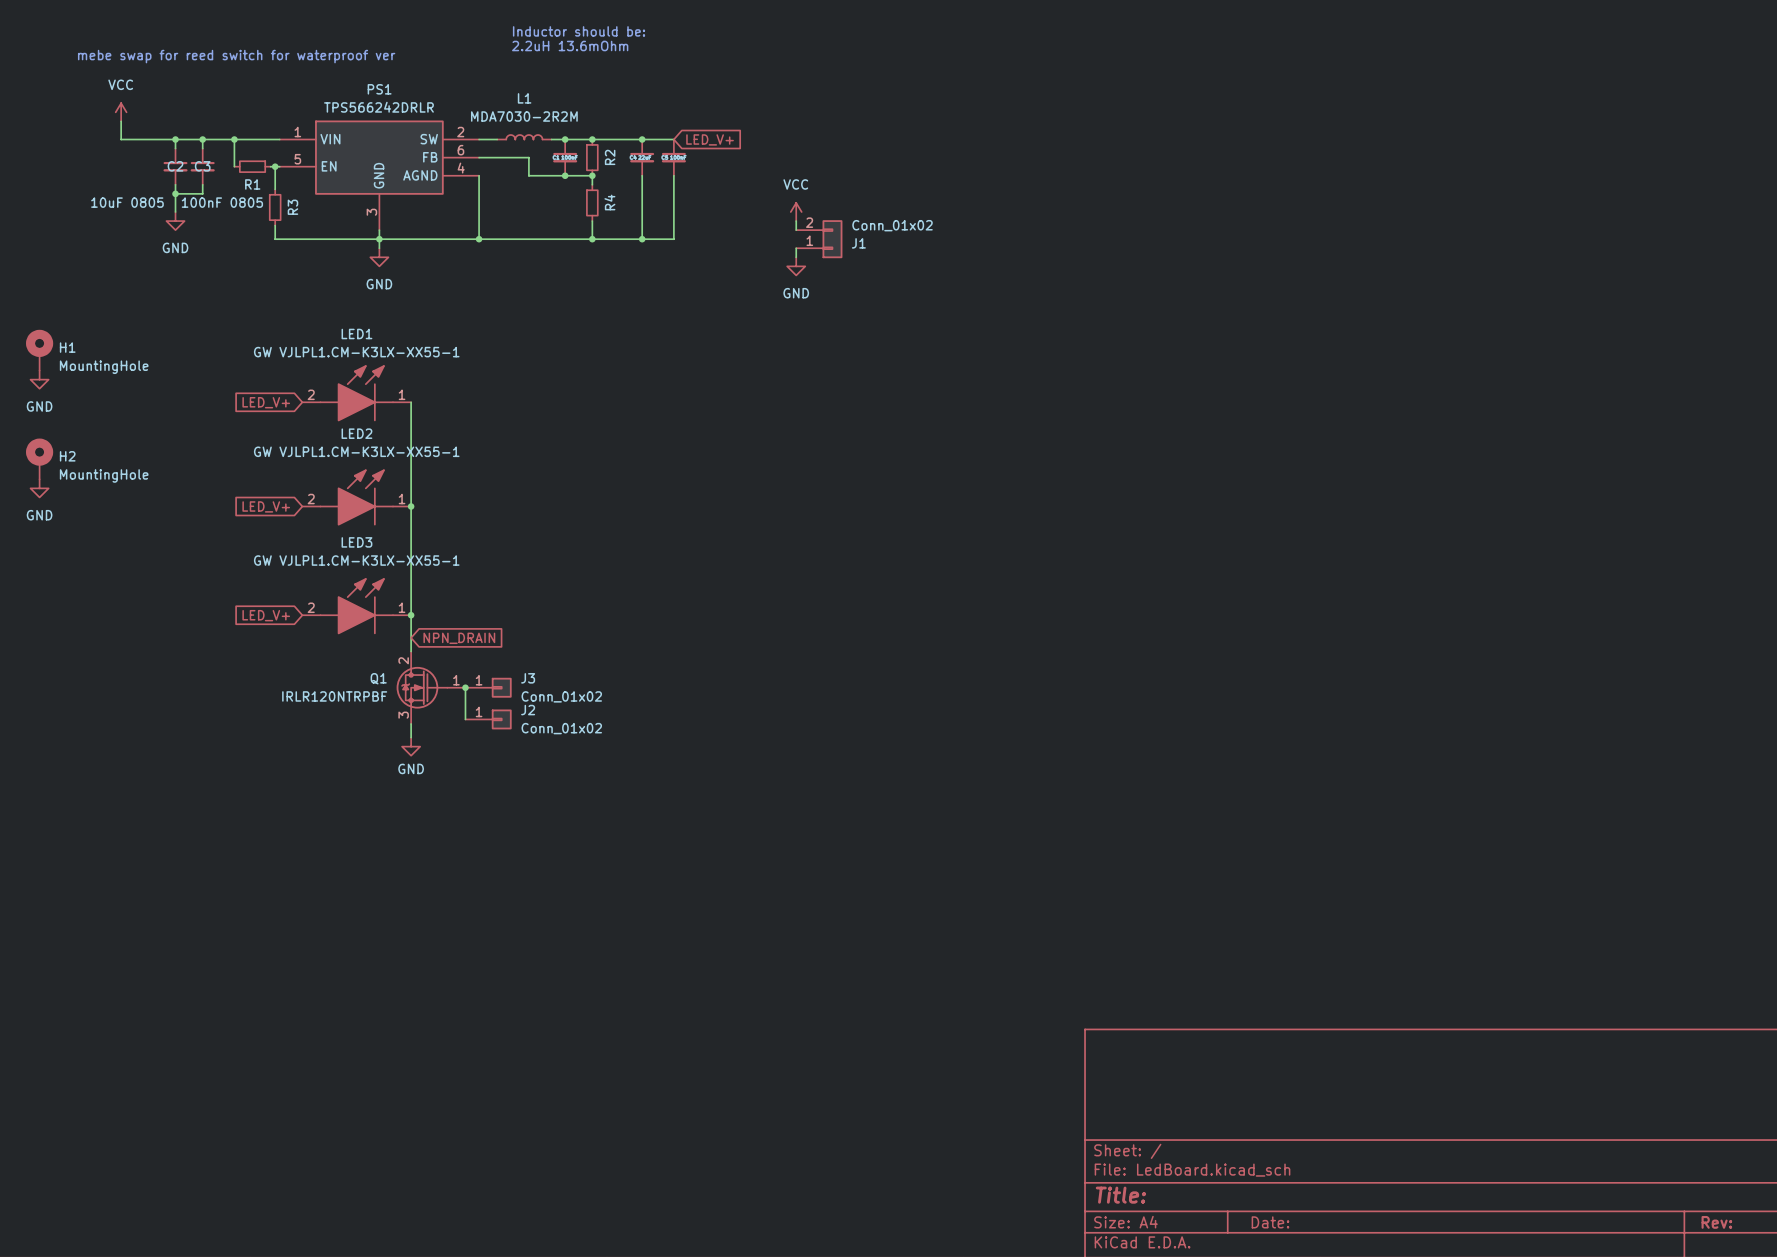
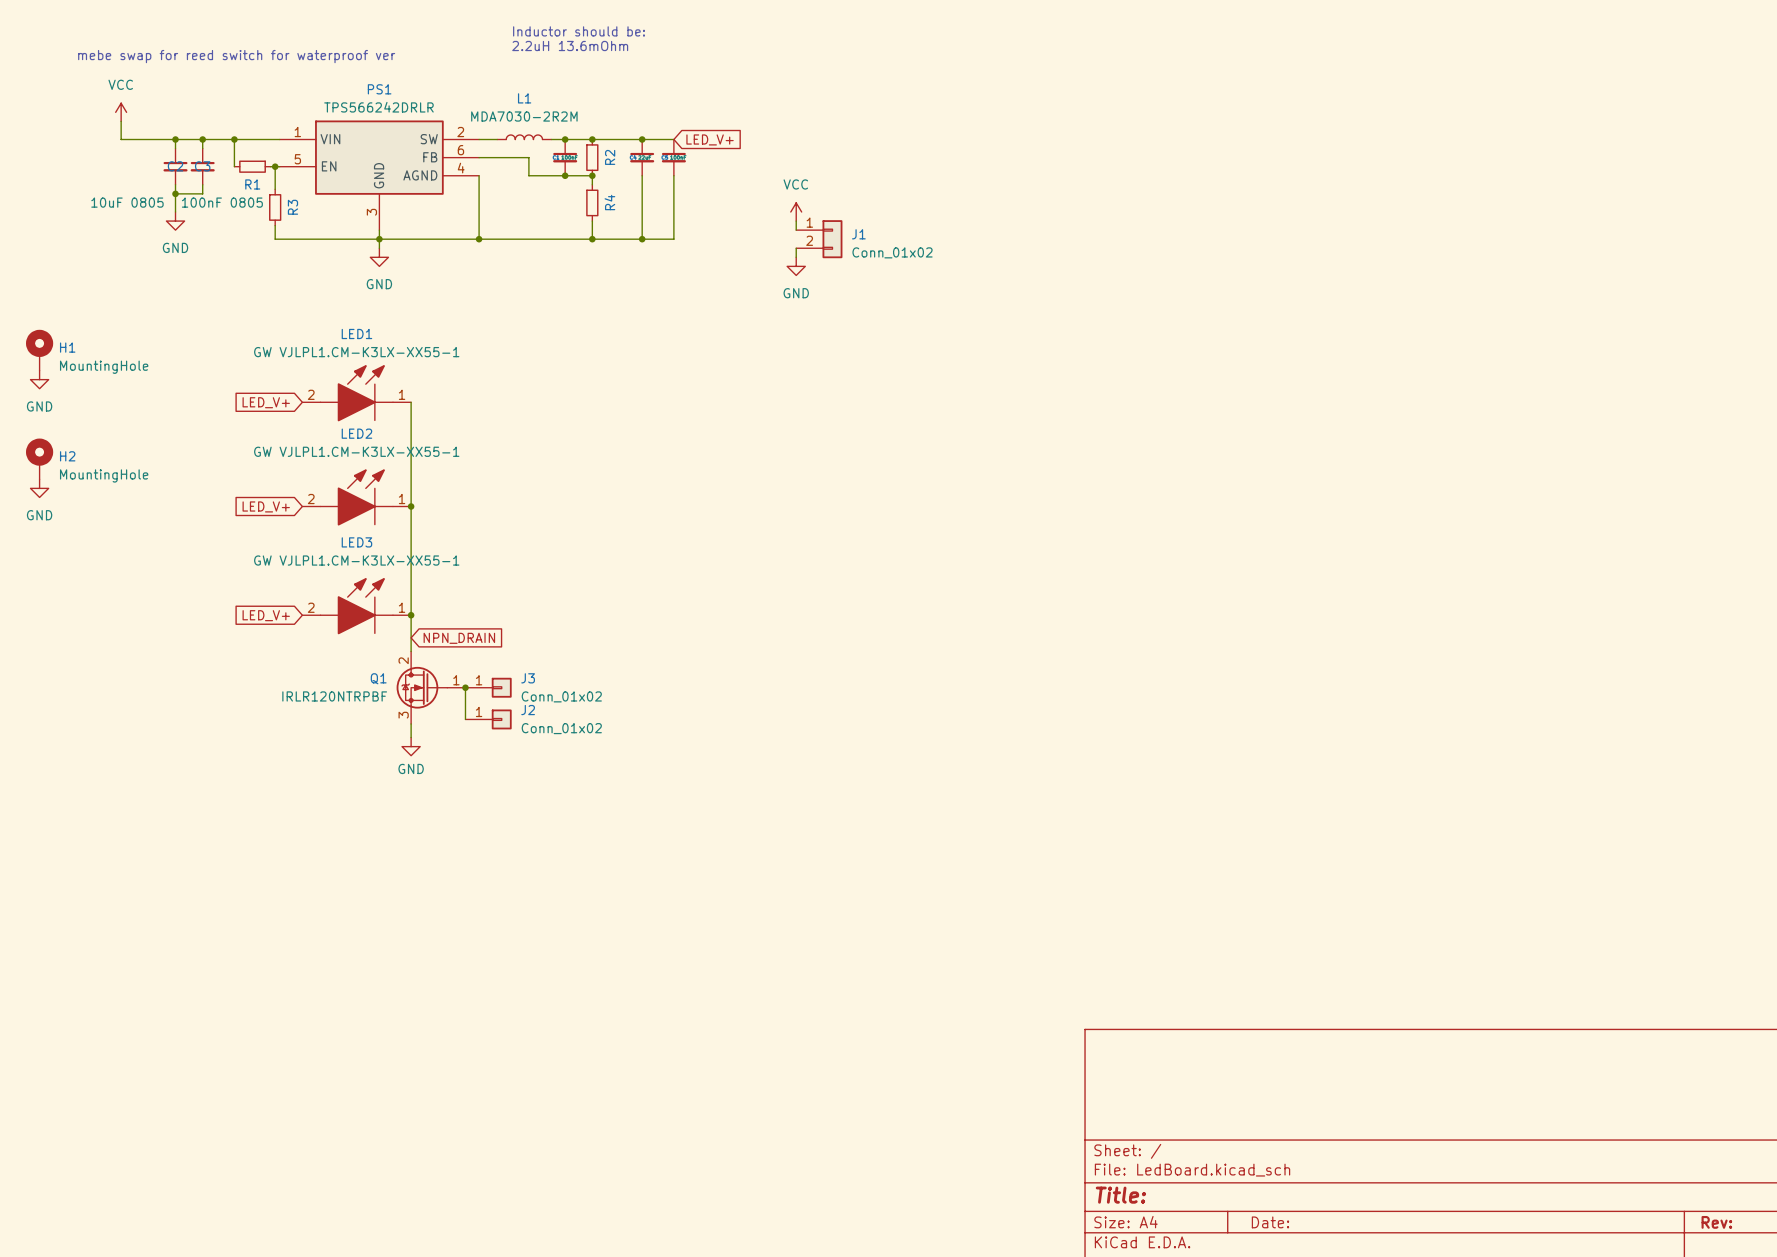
J1 flip: as is (832, 239) -> up-down (832, 239)

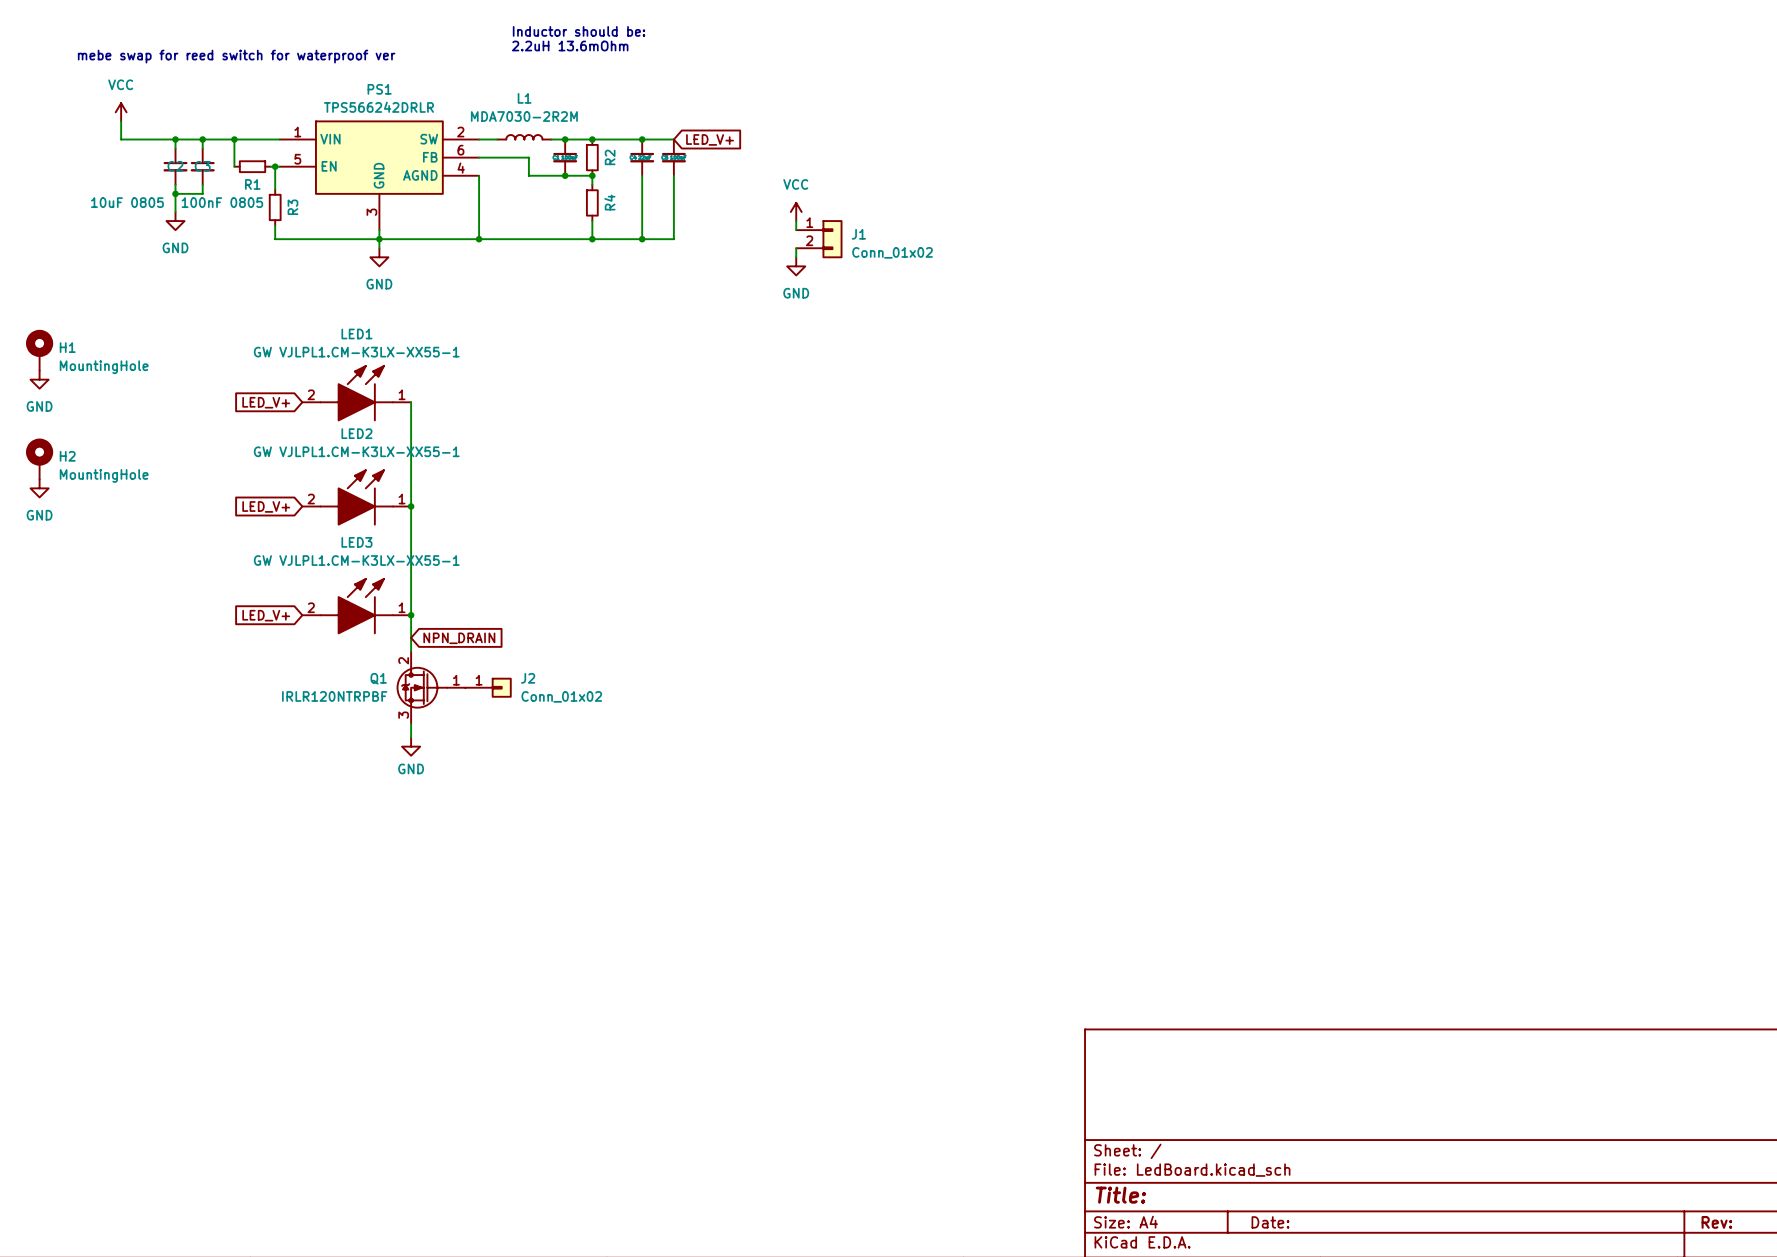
J3 name: J3 (528, 678) -> J2 (528, 678)
wire: (465, 687) (465, 719) -> none
junction: (465, 687) -> none
J2: Conn_01x02 (488, 719) -> none

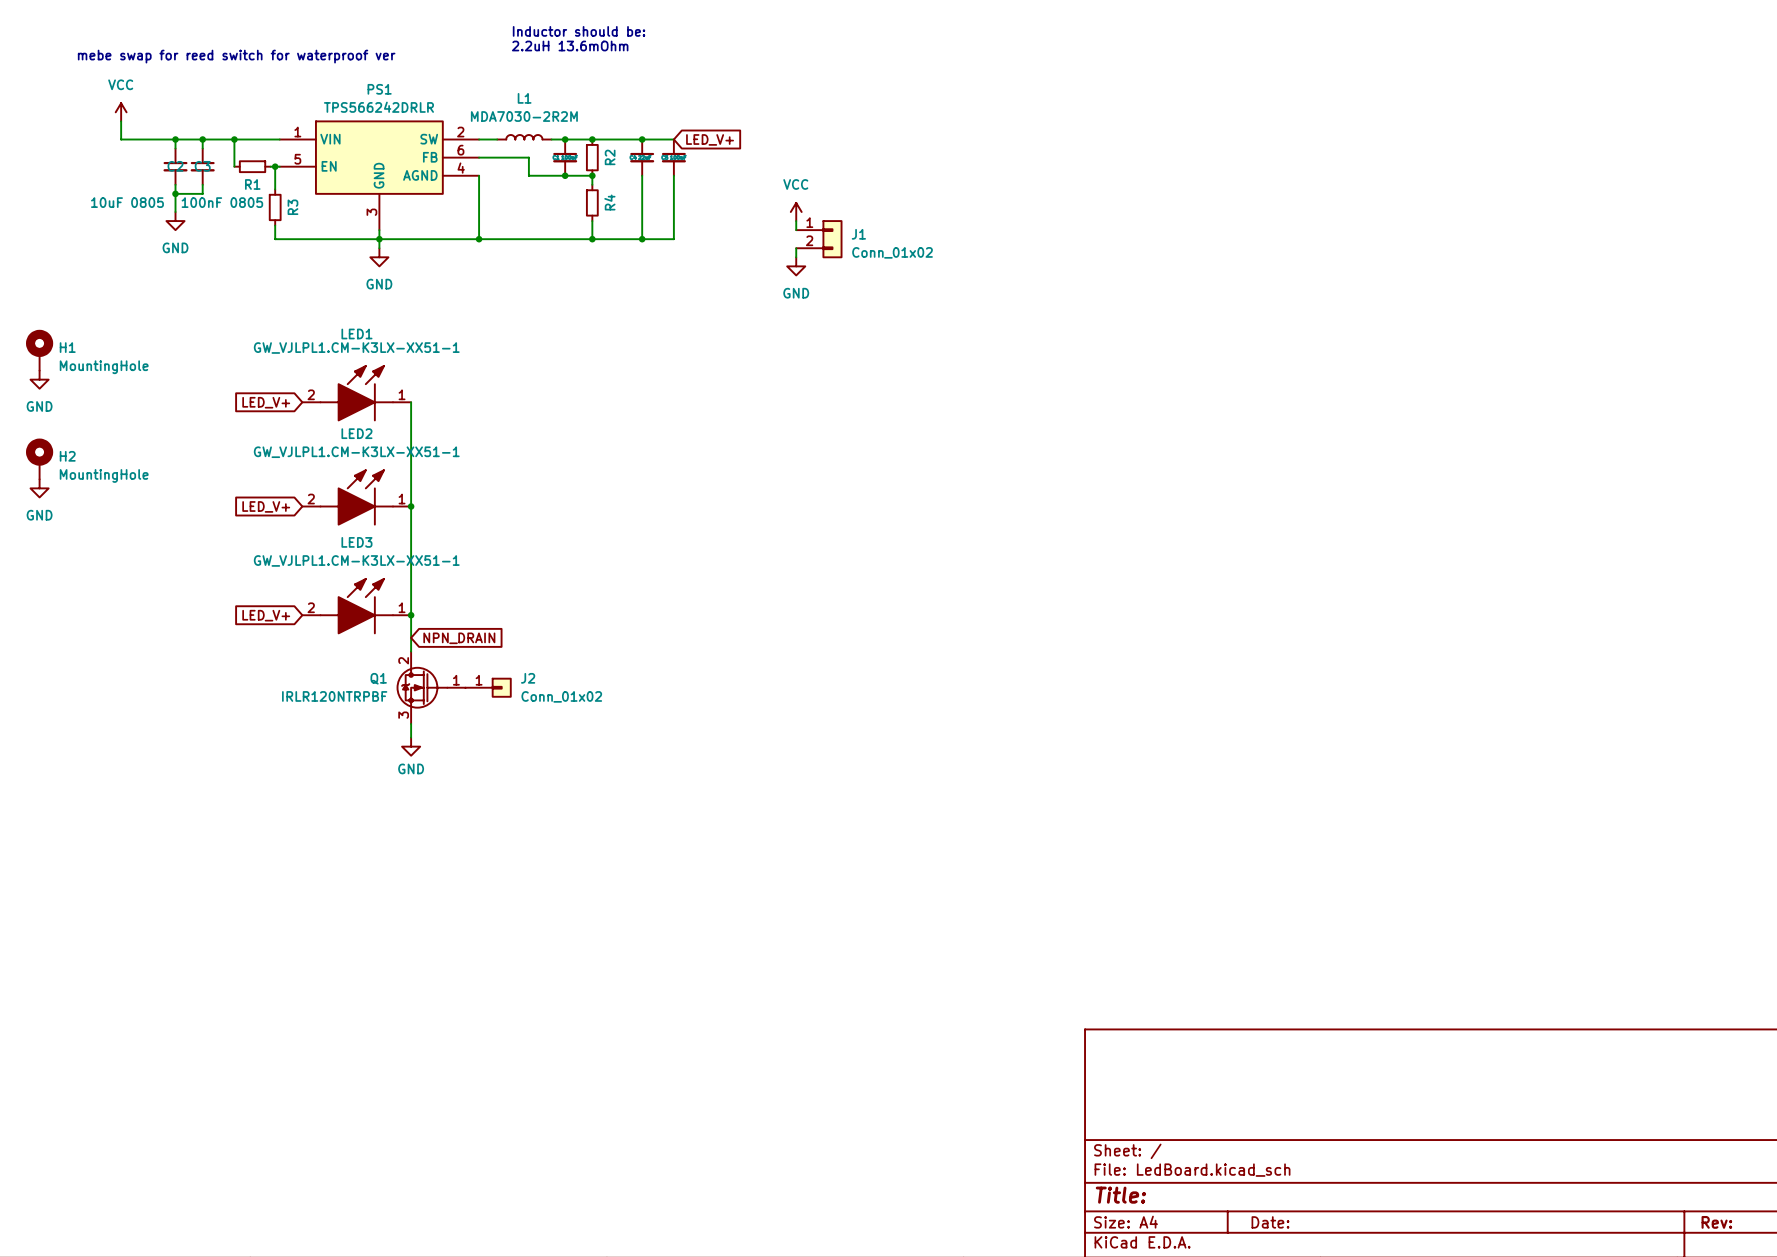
LED1 value: GW VJLPL1.CM-K3LX-XX55-1 (356, 352) -> GW_VJLPL1.CM-K3LX-XX51-1 (356, 348)
LED2 value: GW VJLPL1.CM-K3LX-XX55-1 (356, 451) -> GW_VJLPL1.CM-K3LX-XX51-1 (356, 452)
LED3 value: GW VJLPL1.CM-K3LX-XX55-1 (356, 560) -> GW_VJLPL1.CM-K3LX-XX51-1 (356, 560)

